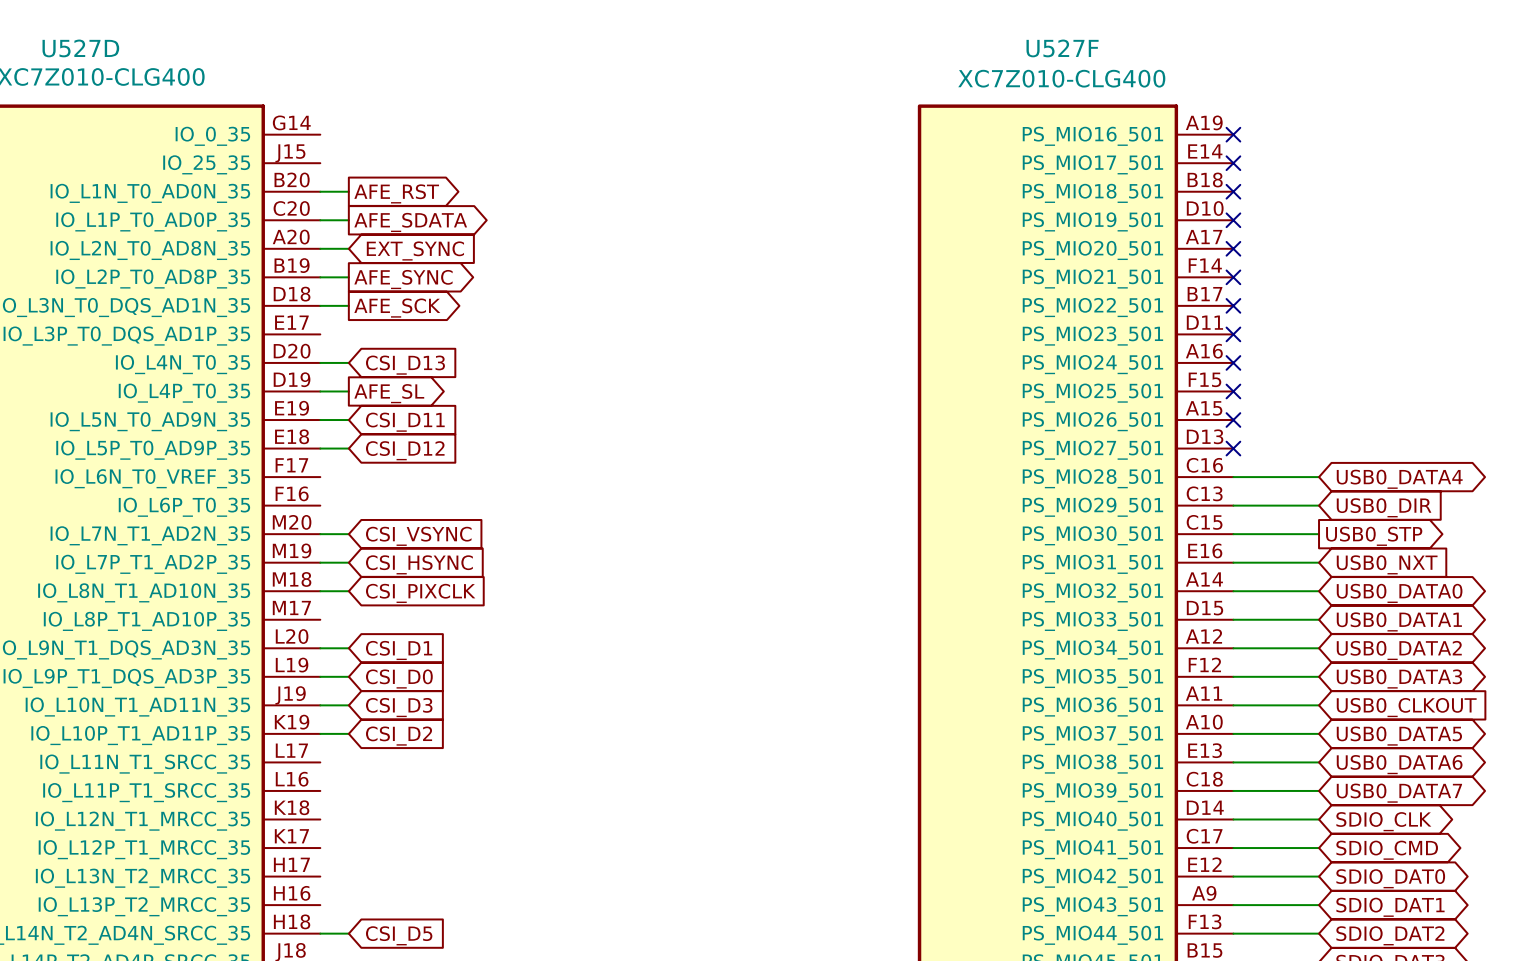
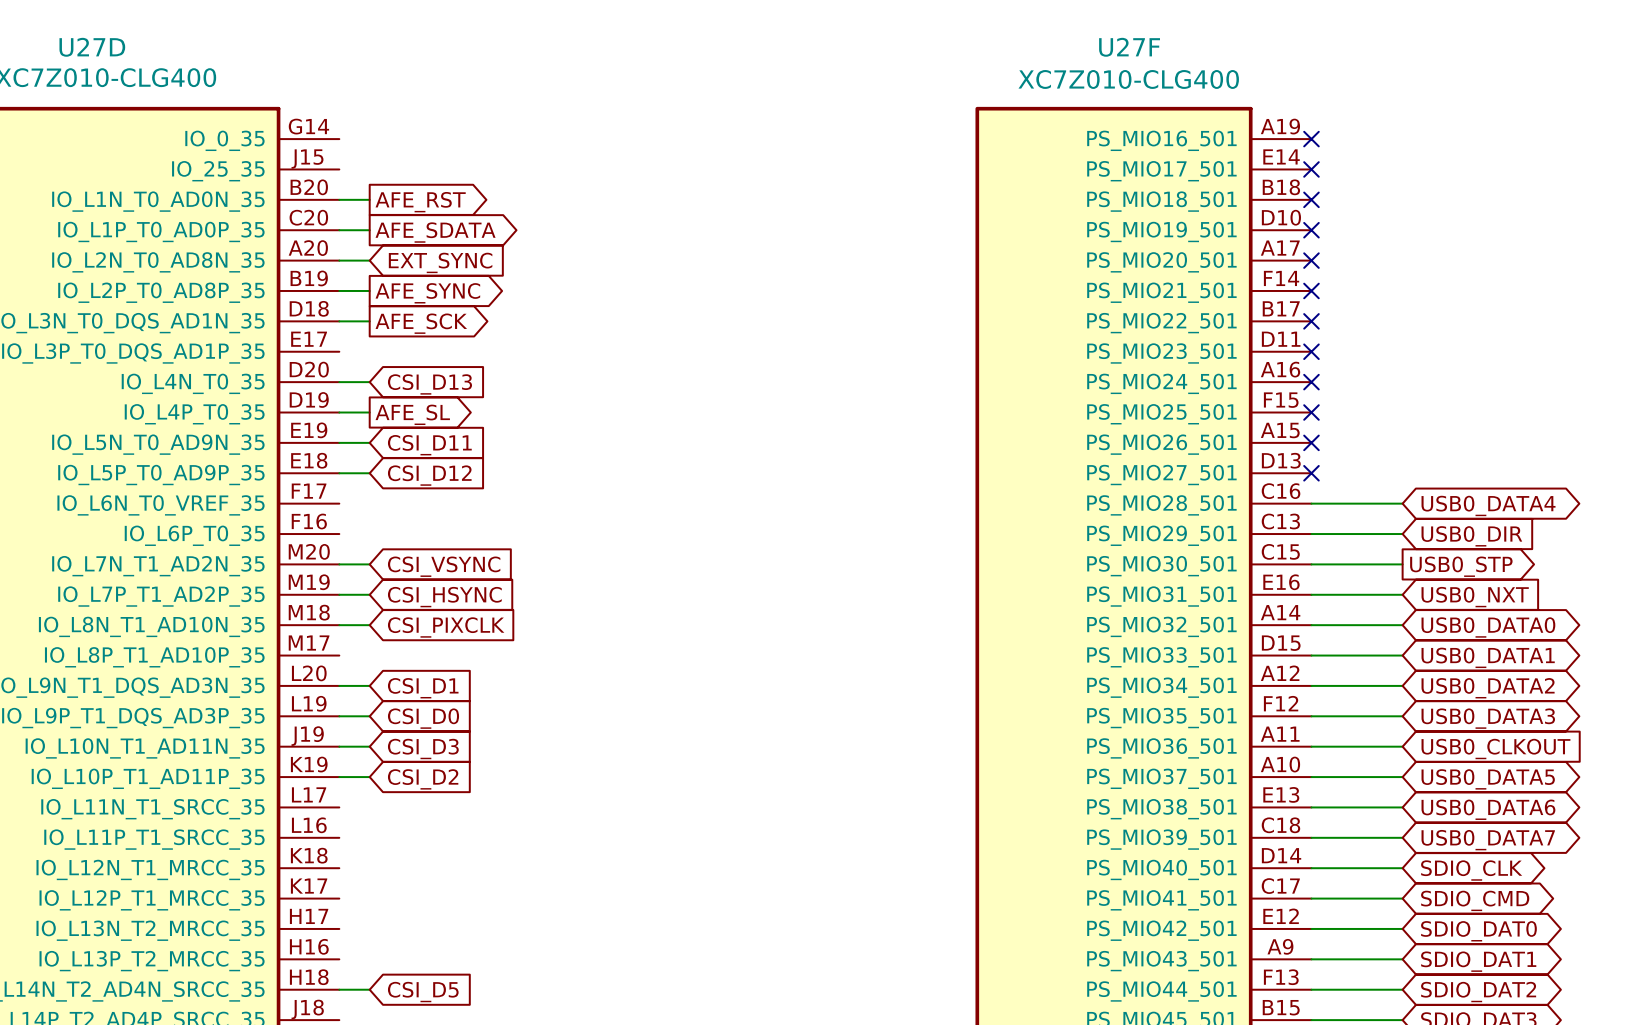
U527D name: U527D (80, 48) -> U27D (92, 47)
U527F name: U527F (1062, 48) -> U27F (1129, 47)

